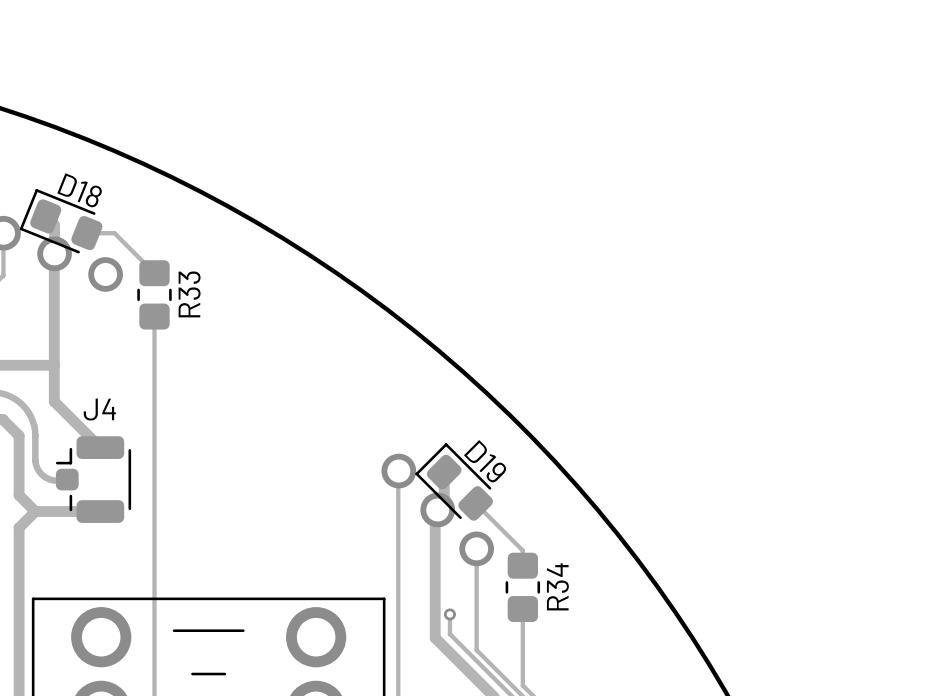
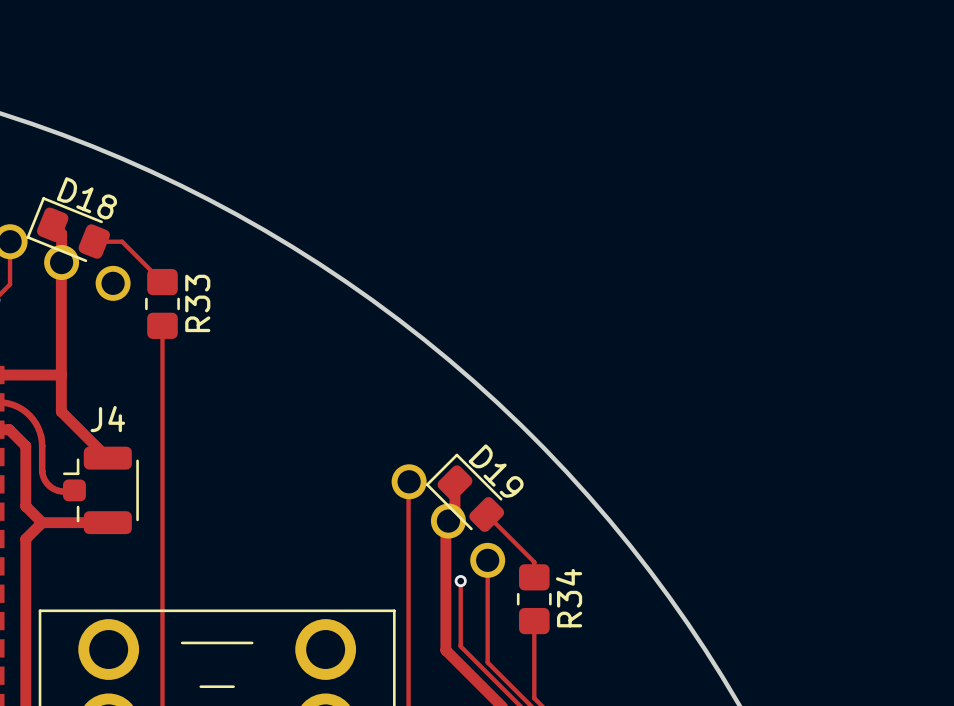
track: none -> (460, 581) (460, 626)
via position: (449, 614) -> (460, 581)

